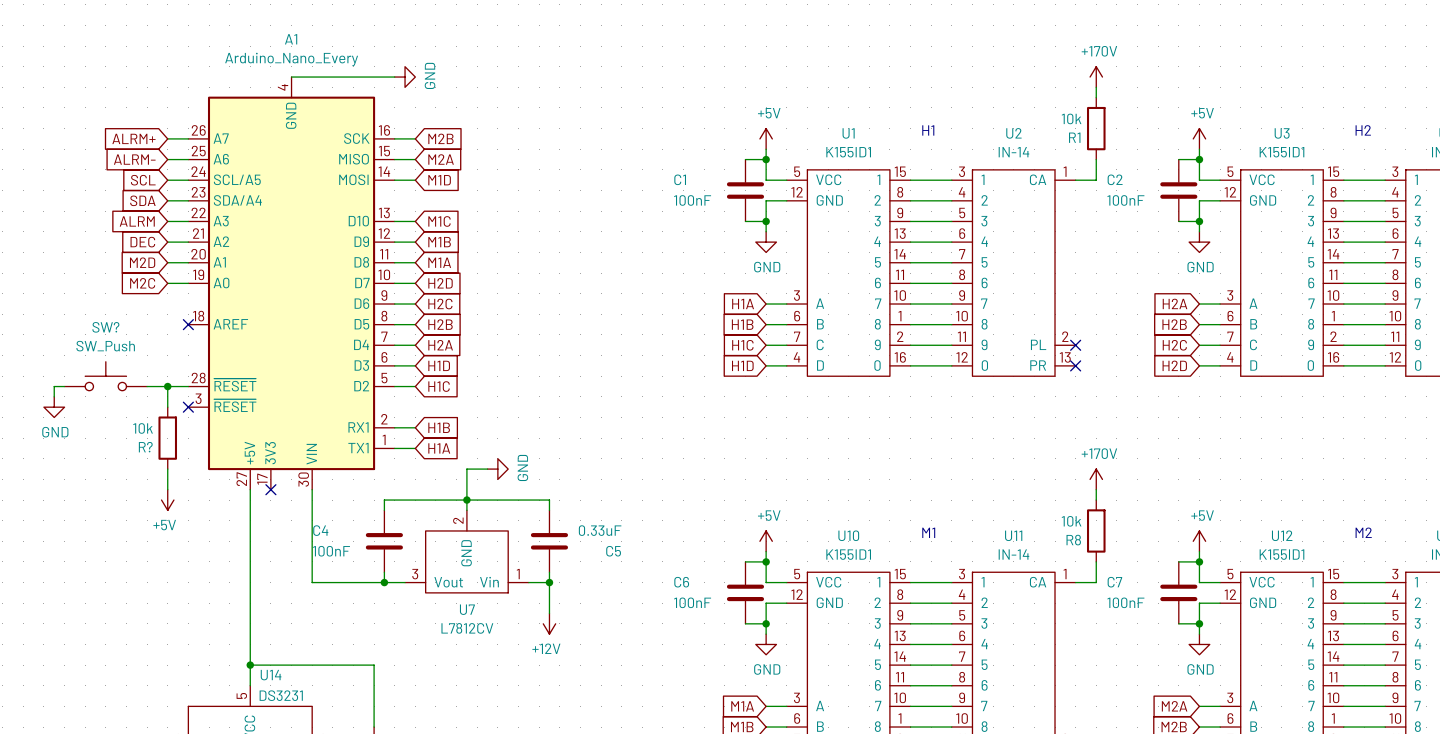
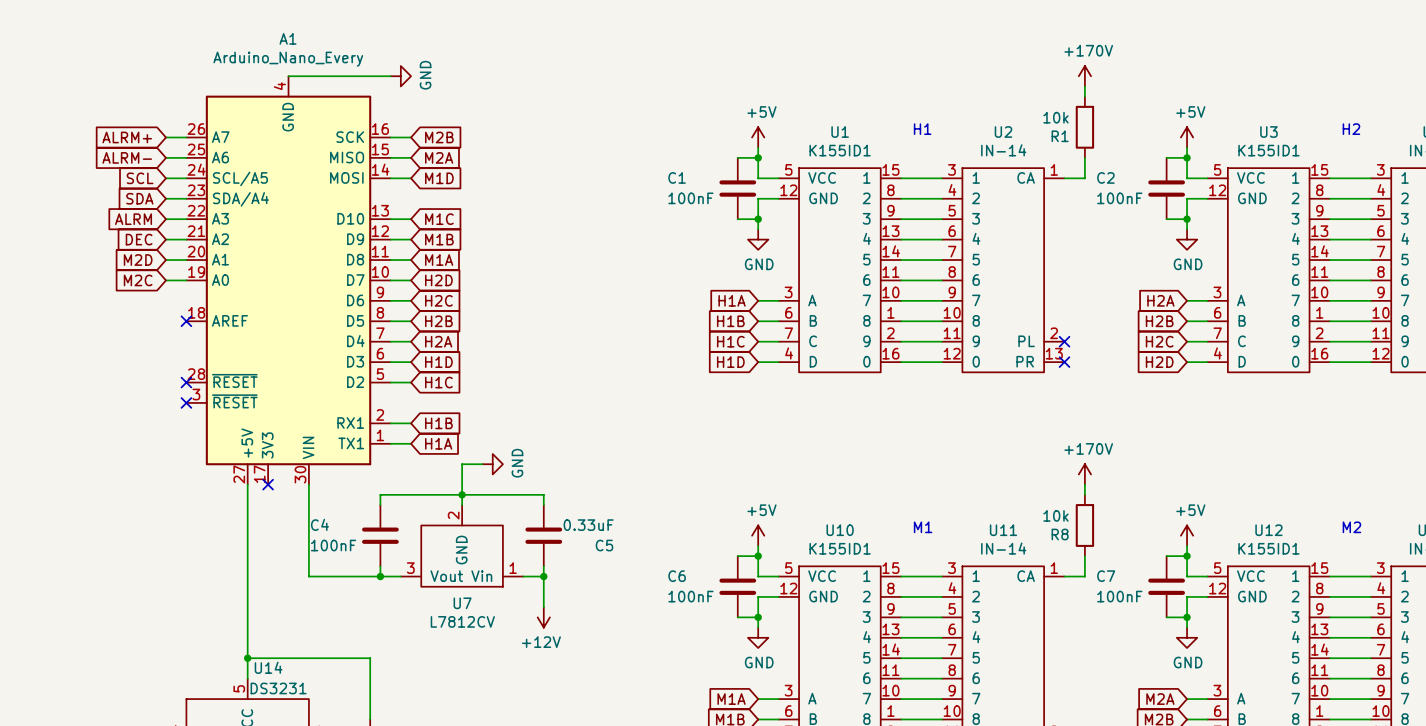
SW?: SW_Push (105, 376) -> none
wire: (64, 386) (54, 386) (54, 396) -> none
wire: (147, 386) (188, 386) -> none
wire: (167, 386) (167, 407) -> none
junction: (167, 386) -> none
no-connect mark: none -> (186, 382)
power symbol: GND (54, 407) -> none
R?: 10k (167, 438) -> none
wire: (167, 469) (167, 489) -> none
power symbol: +5V (167, 500) -> none

